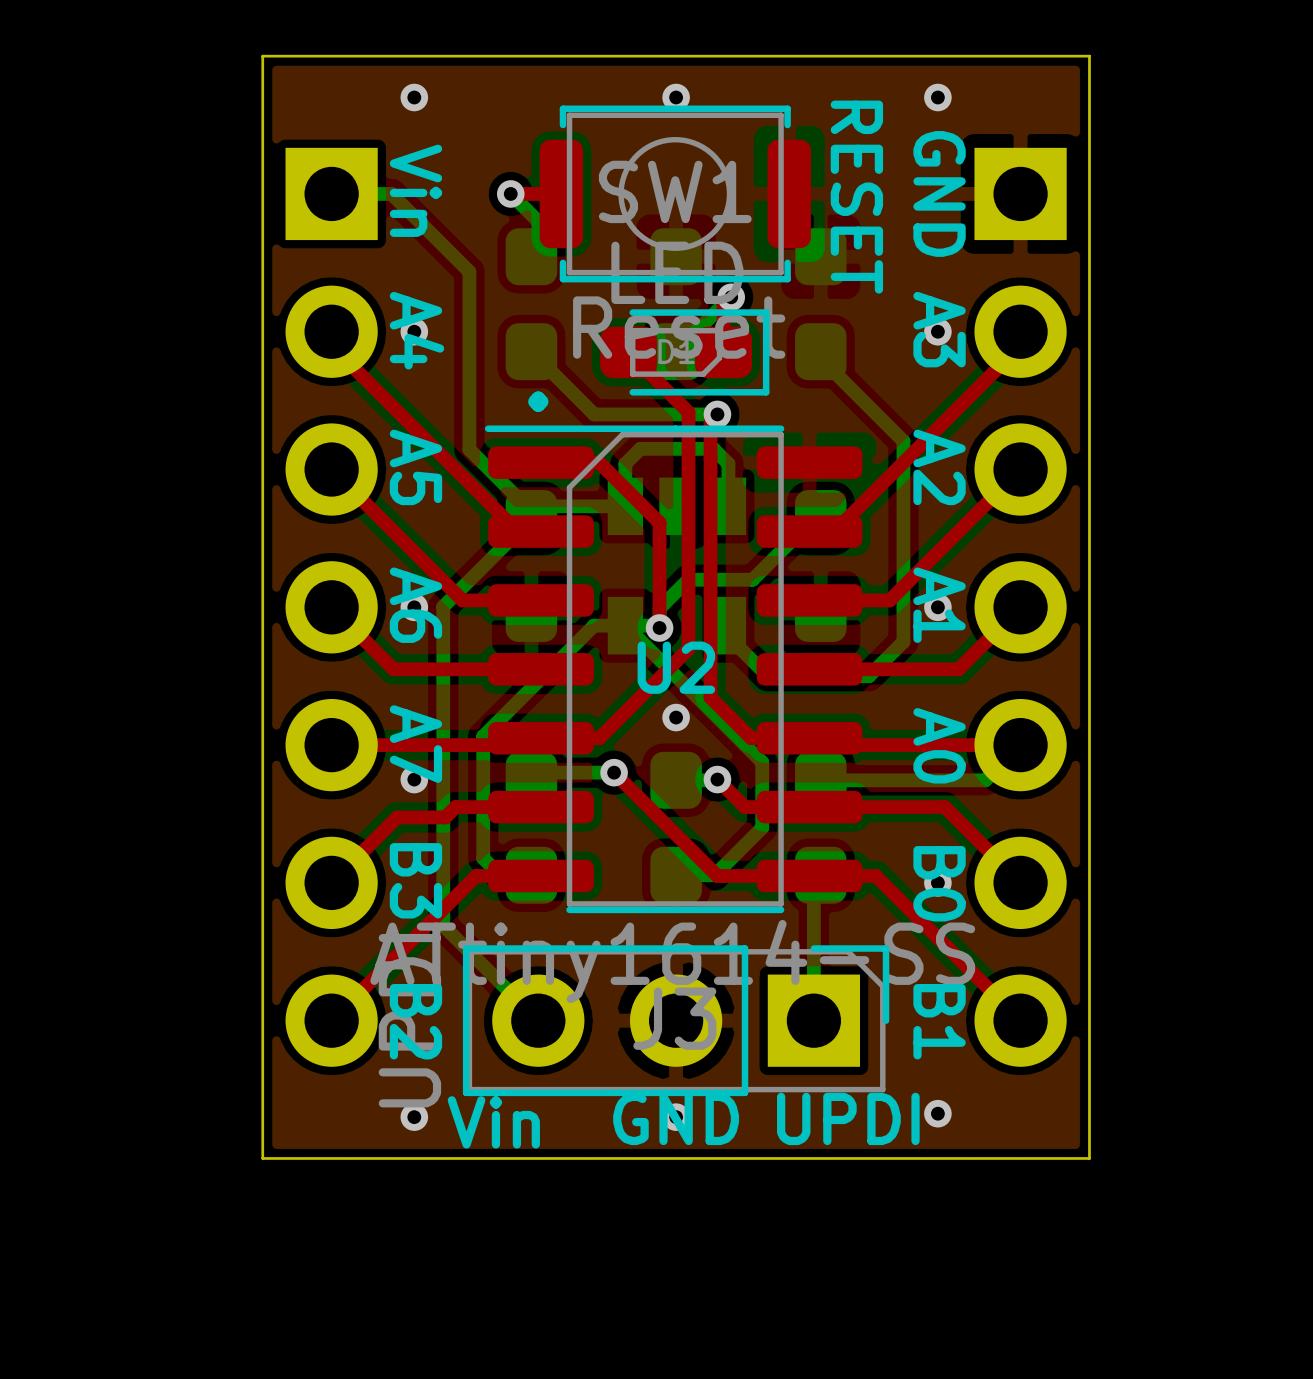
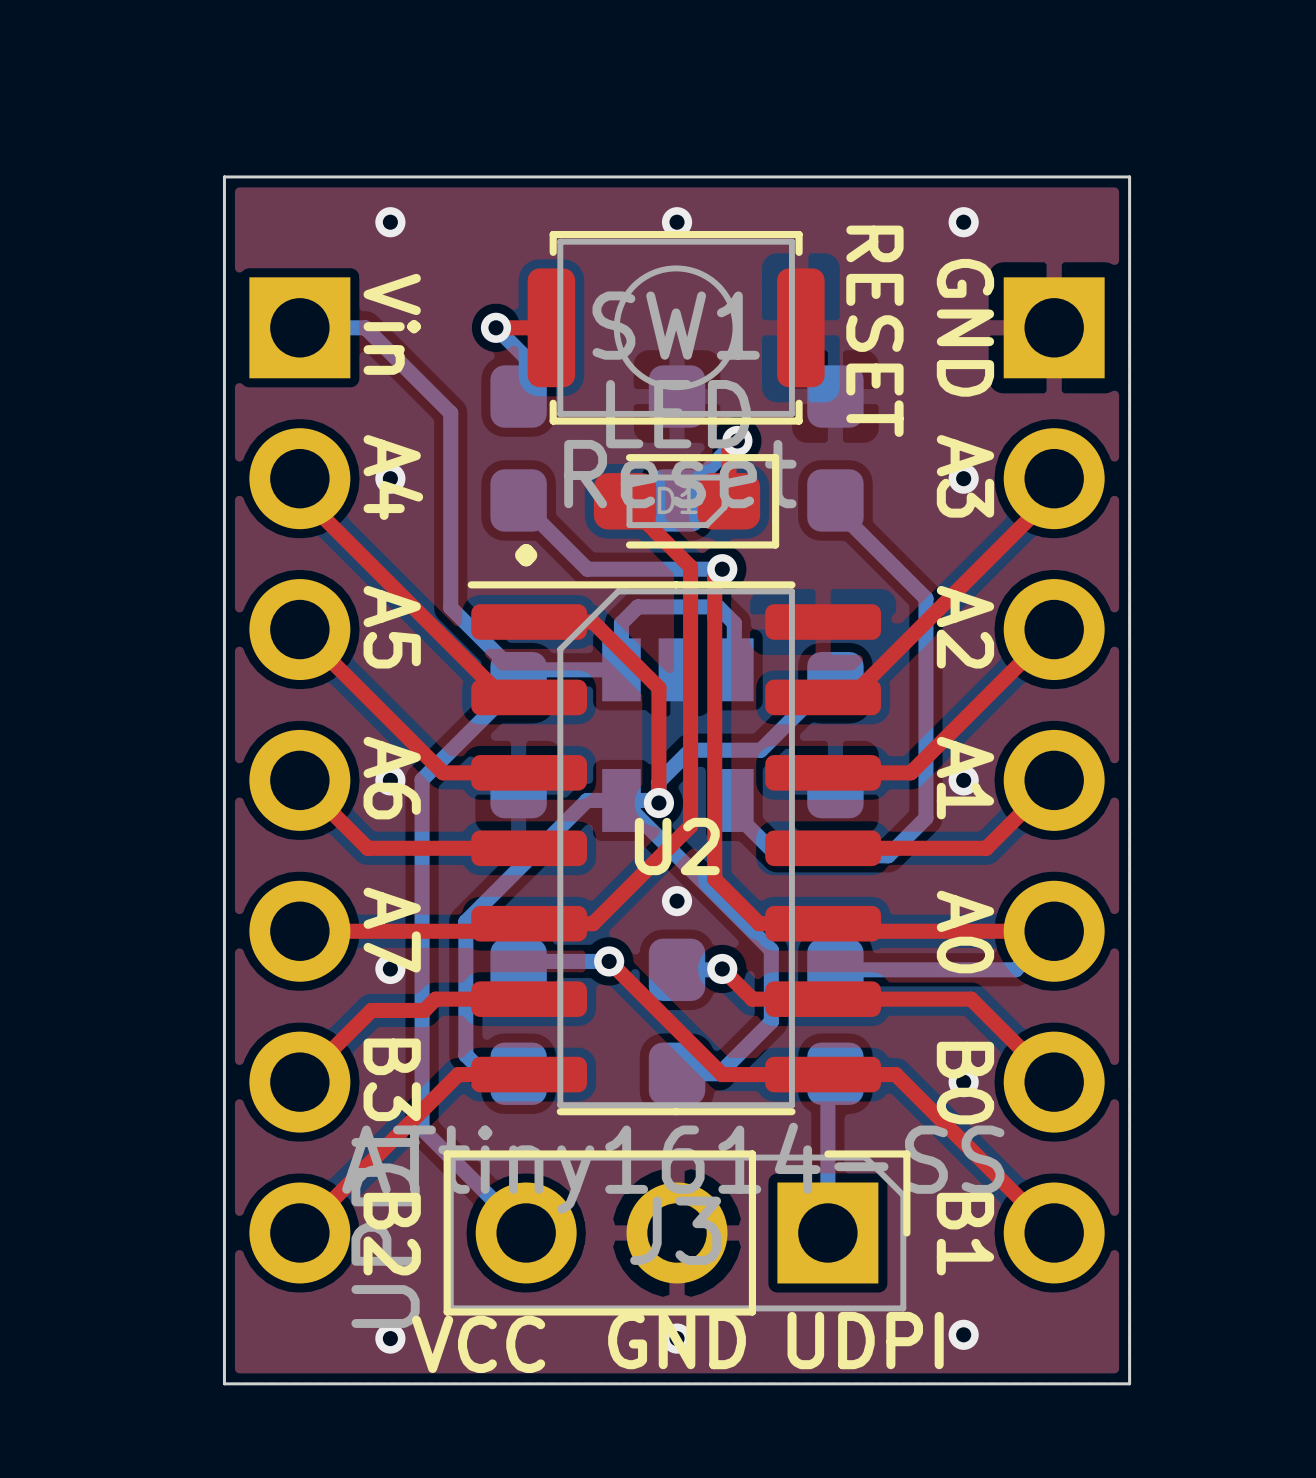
text: UPDI (848, 1118) -> UDPI (865, 1340)
text: Vin (493, 1122) -> VCC (478, 1344)

